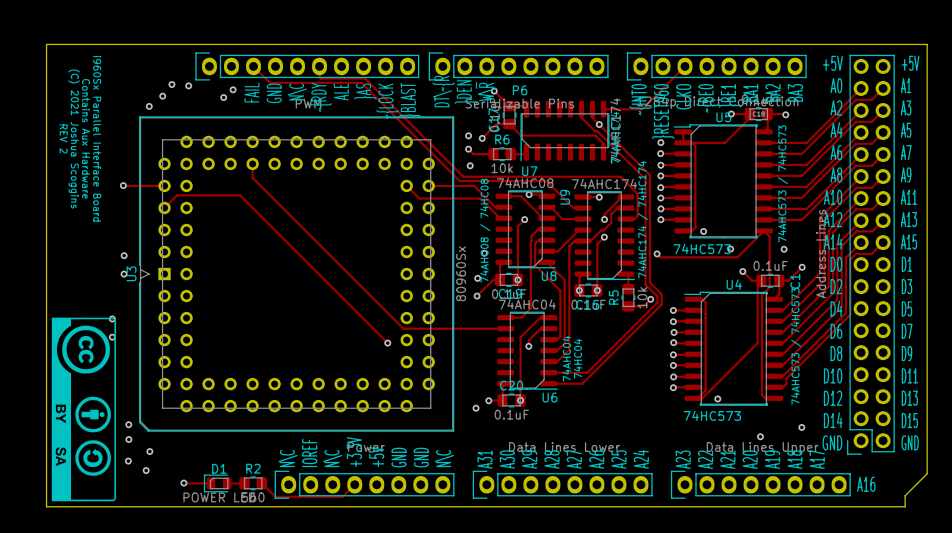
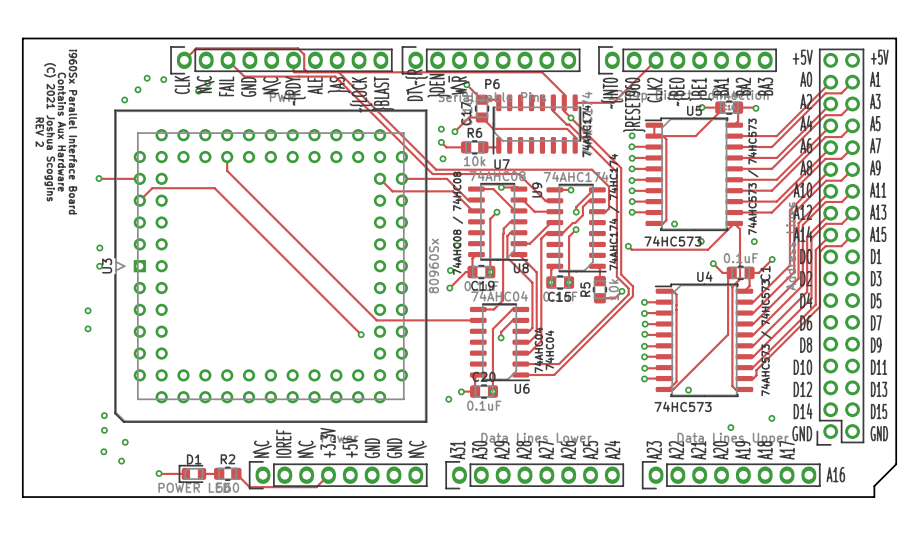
track: none -> (184, 60) (196, 48) (297, 48) (304, 54) (304, 68) (307, 72)
track: none -> (338, 72) (542, 72) (564, 94) (564, 102)
text: none -> N\C (205, 84)
text: none -> CLK (182, 84)
text: CLKO (683, 96) -> CLK2 (654, 90)
drawing: [51, 317, 117, 502] -> none

